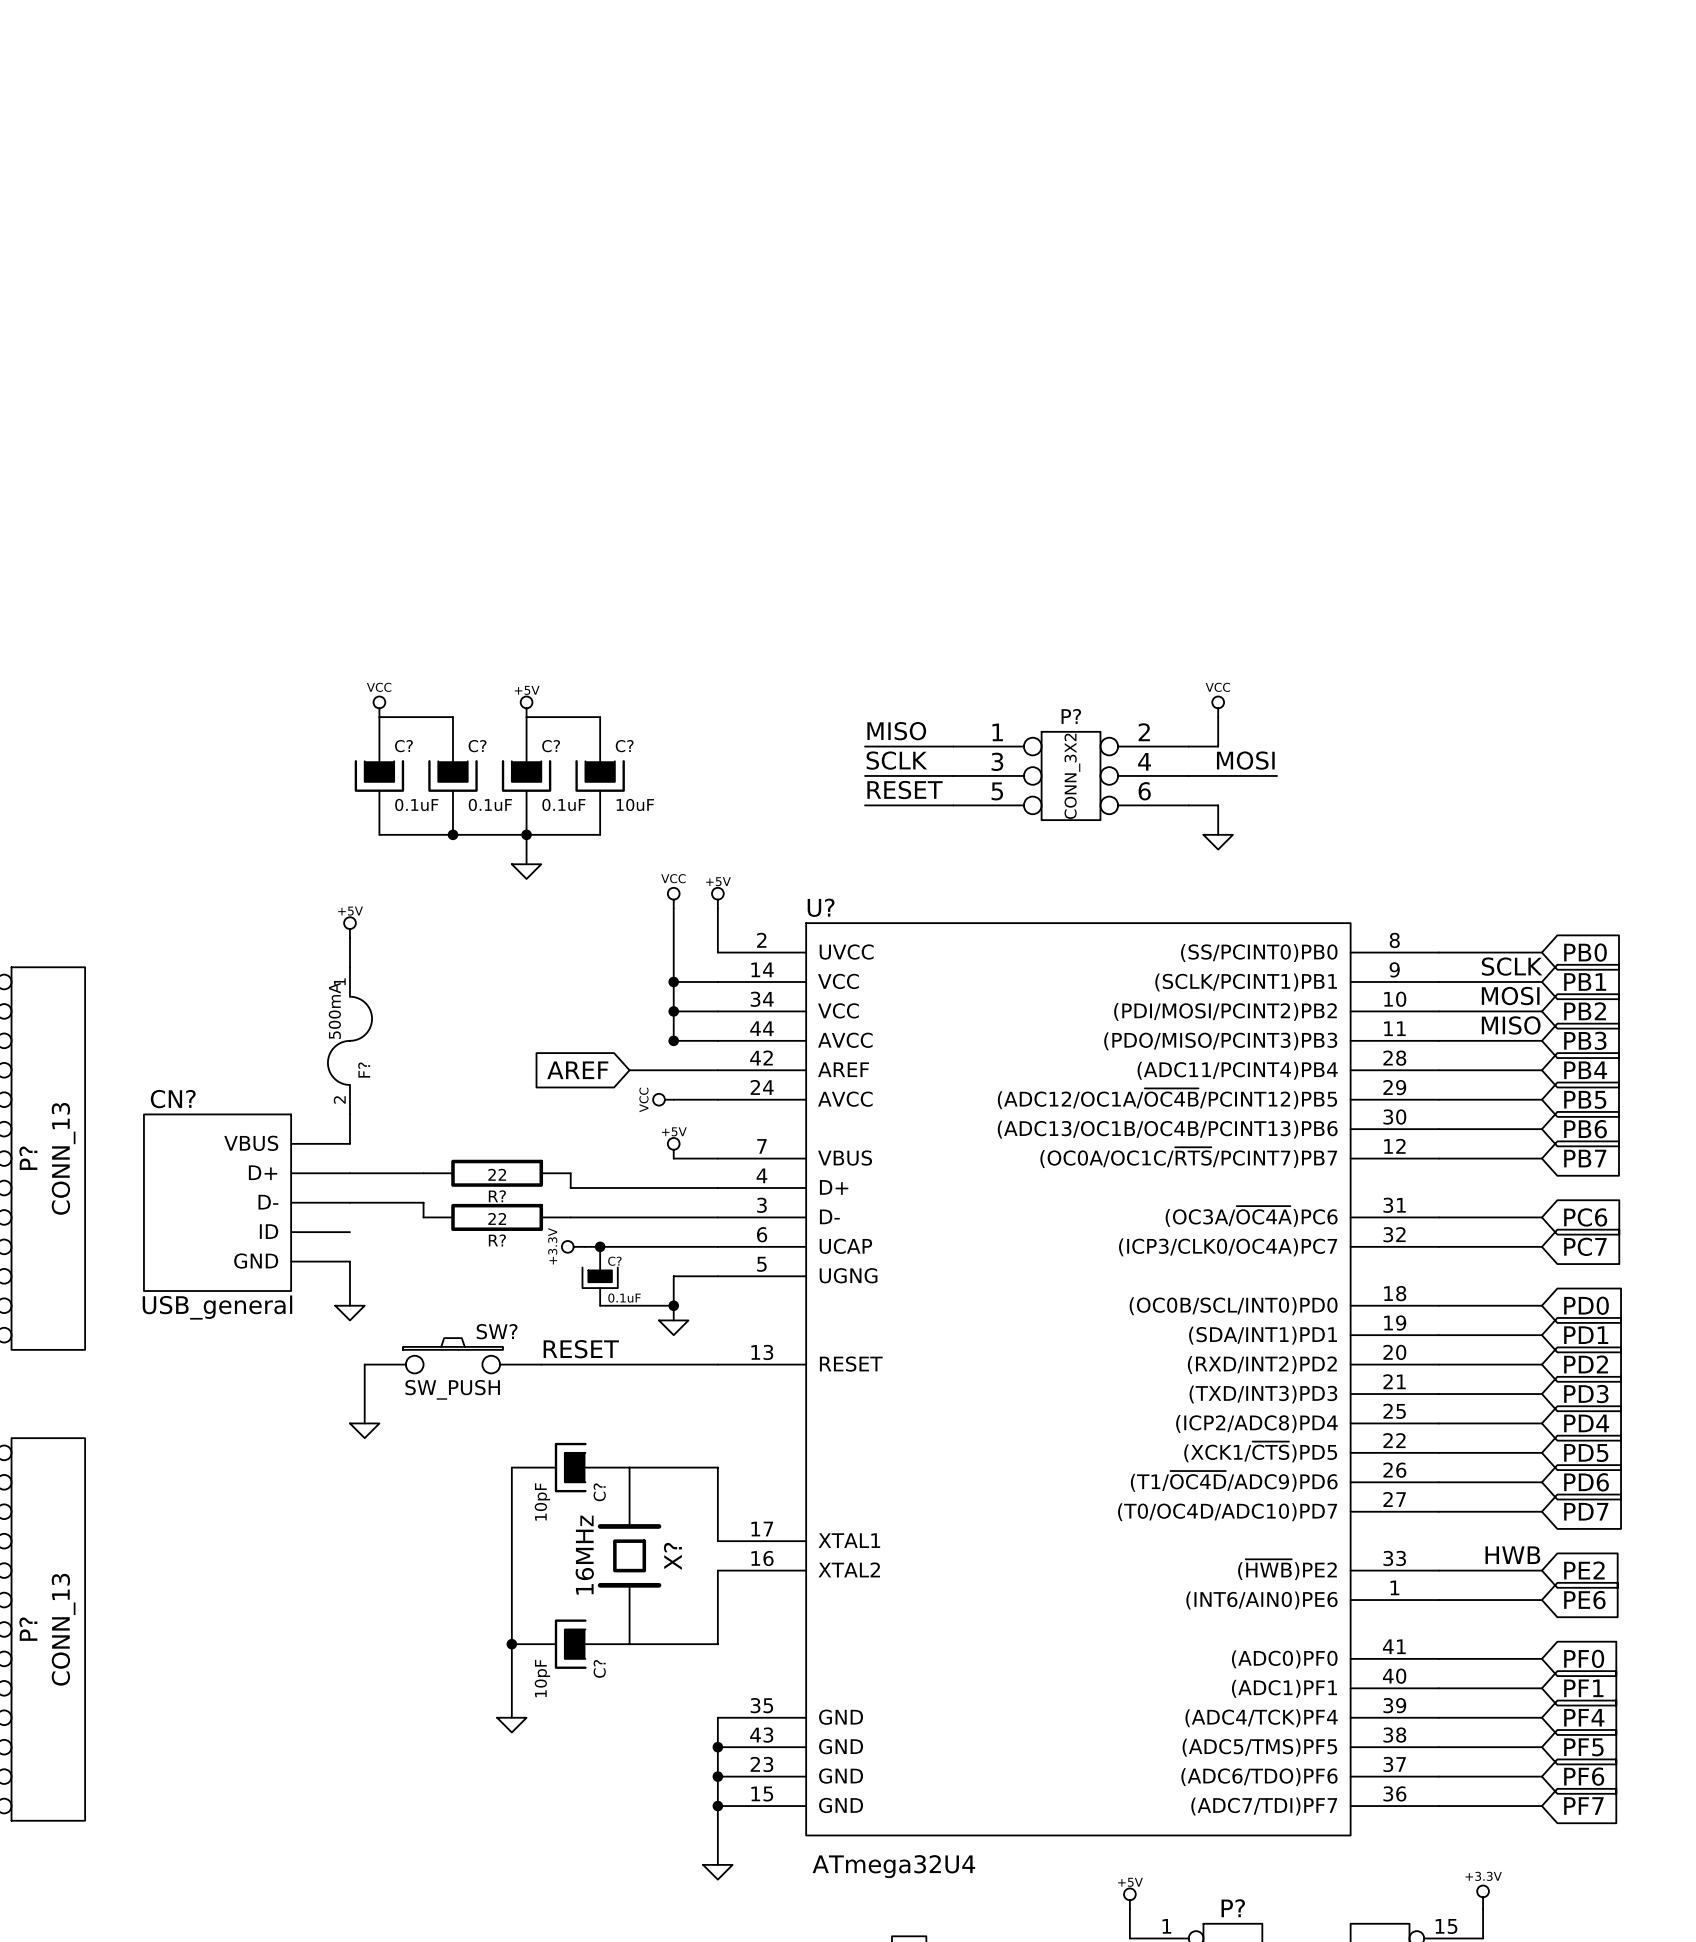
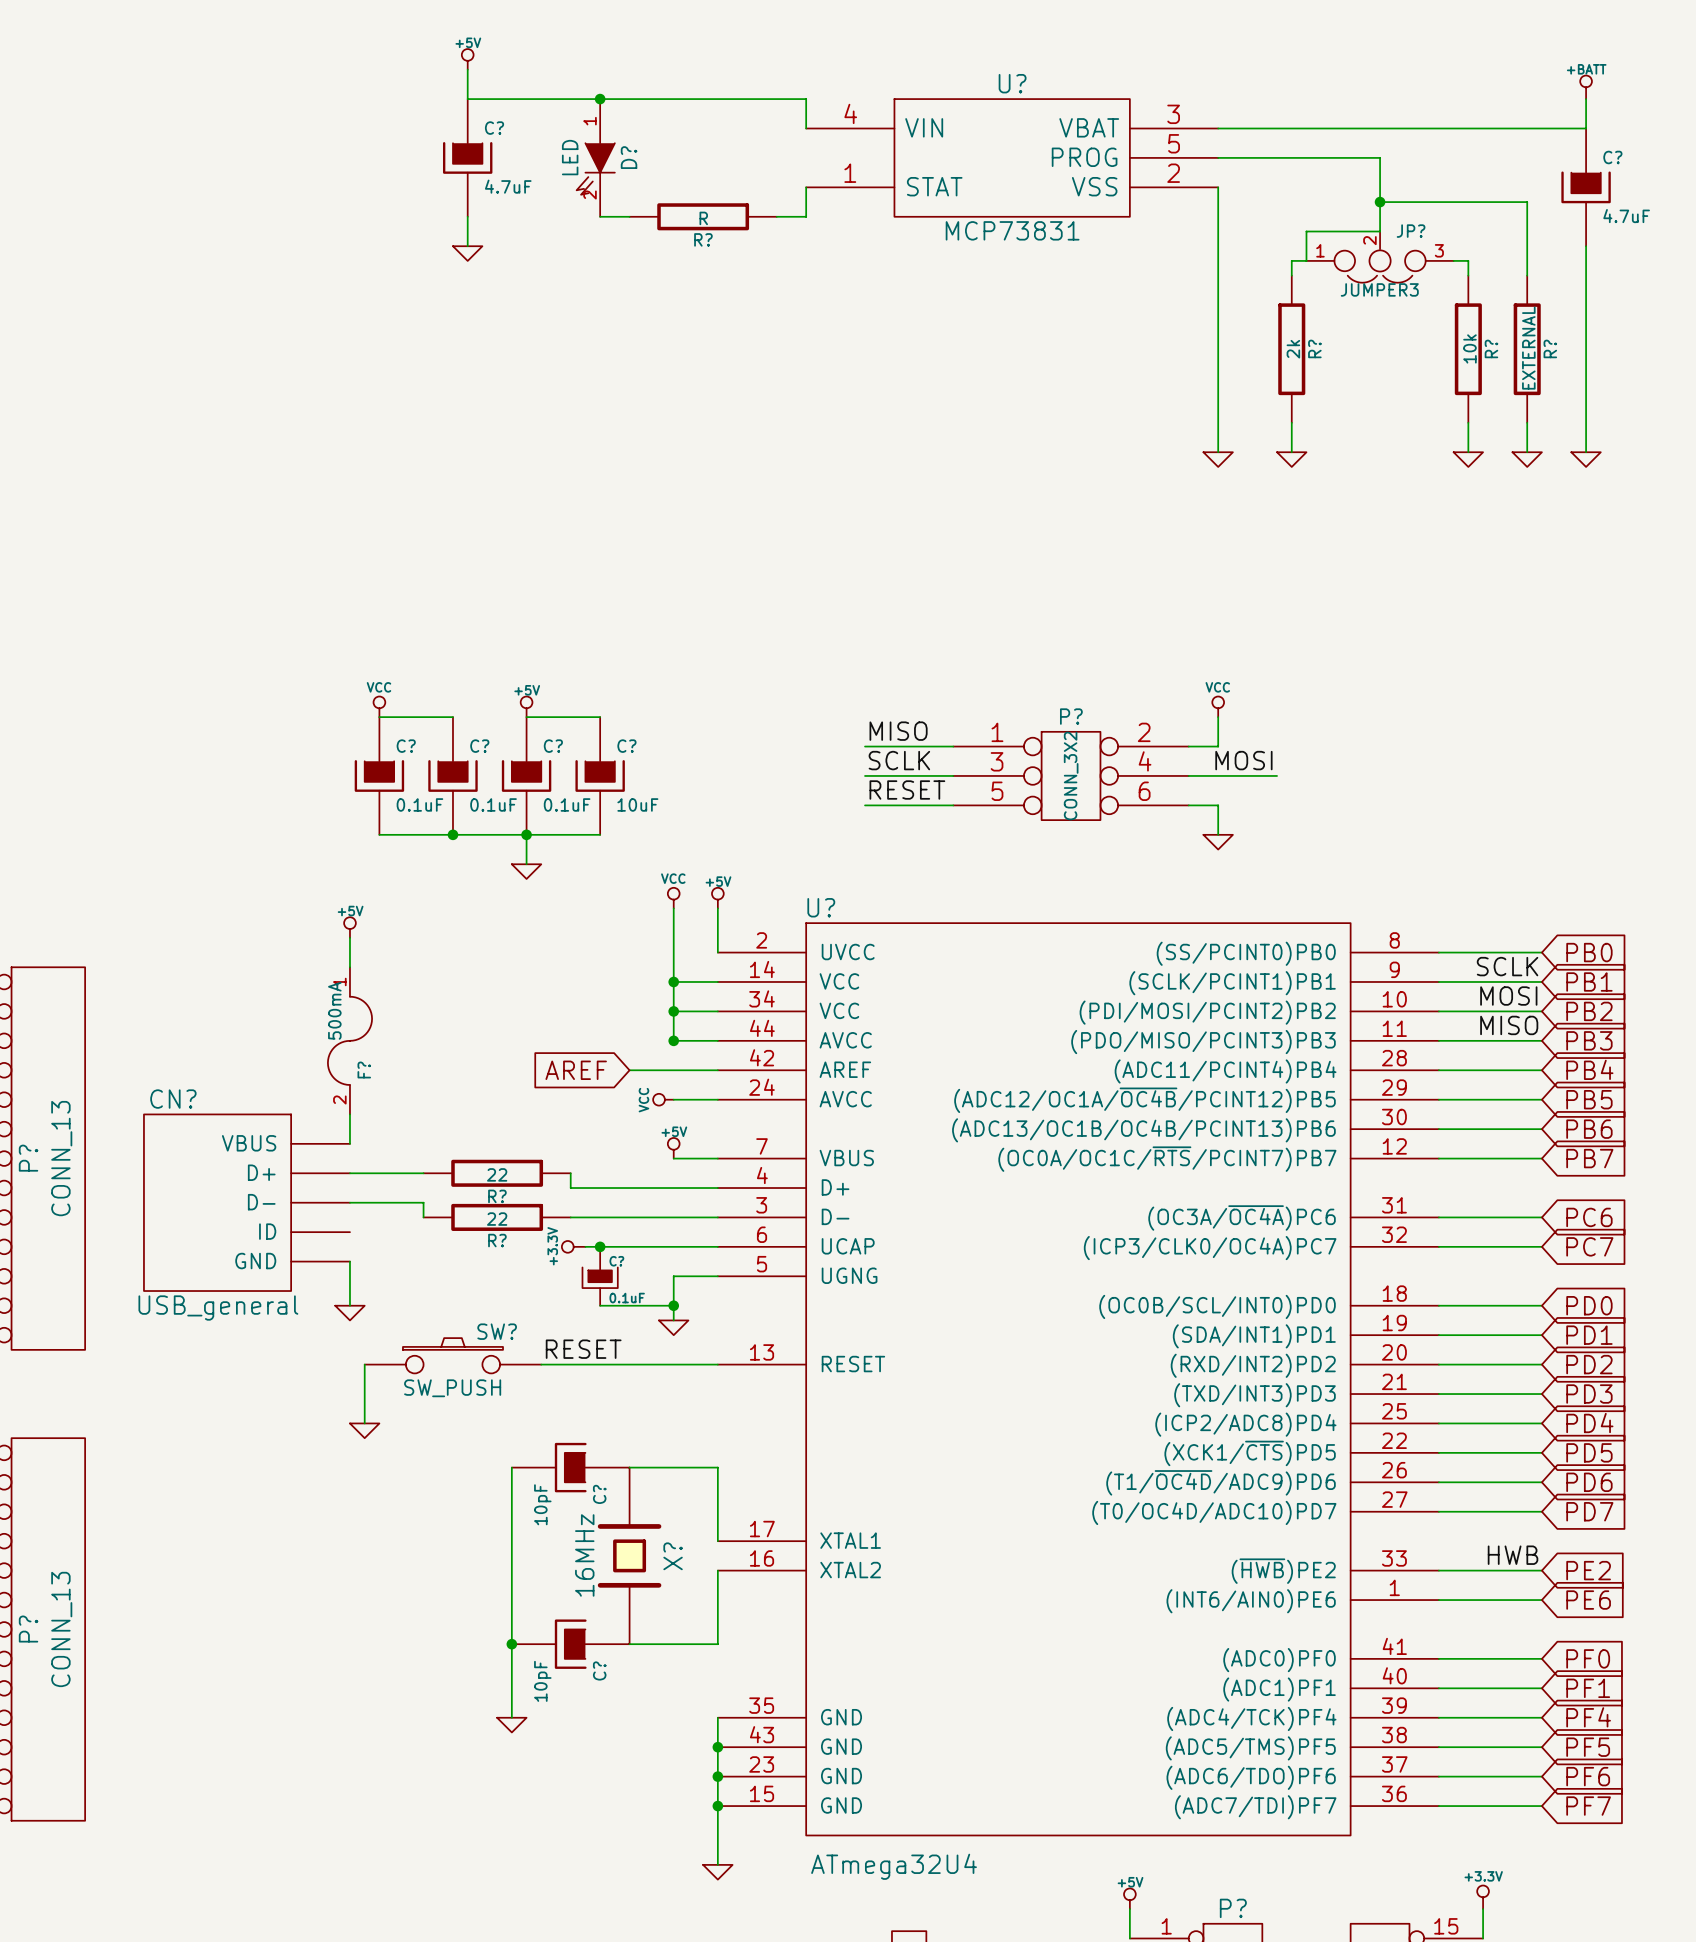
power symbol: none -> +5V (467, 59)
wire: none -> (467, 69) (467, 99) (806, 99) (806, 128)
power symbol: none -> +BATT (1586, 87)
junction: none -> (600, 99)
wire: none -> (1586, 99) (1586, 128) (1218, 128)
C?: none -> 4.7uF (467, 157)
D?: none -> LED (595, 157)
U?: none -> MCP73831 (1012, 157)
wire: none -> (1218, 157) (1380, 157) (1380, 231) (1306, 231) (1306, 260) (1291, 260) (1291, 275)
wire: none -> (806, 187) (806, 216) (776, 216)
wire: none -> (1218, 187) (1218, 452)
C?: none -> 4.7uF (1586, 187)
wire: none -> (1380, 202) (1527, 202) (1527, 275)
junction: none -> (1380, 202)
wire: none -> (467, 216) (467, 246)
wire: none -> (600, 216) (629, 216)
R?: none -> R (703, 216)
wire: none -> (1586, 246) (1586, 452)
power symbol: none -> (467, 253)
JP?: none -> JUMPER3 (1380, 257)
wire: none -> (1453, 260) (1468, 260) (1468, 275)
R?: none -> 2k (1291, 349)
R?: none -> 10k (1468, 349)
R?: none -> EXTERNAL (1527, 349)
wire: none -> (1291, 422) (1291, 452)
wire: none -> (1468, 422) (1468, 452)
wire: none -> (1527, 422) (1527, 452)
power symbol: none -> (1218, 459)
power symbol: none -> (1291, 459)
power symbol: none -> (1468, 459)
power symbol: none -> (1527, 459)
power symbol: none -> (1586, 459)

